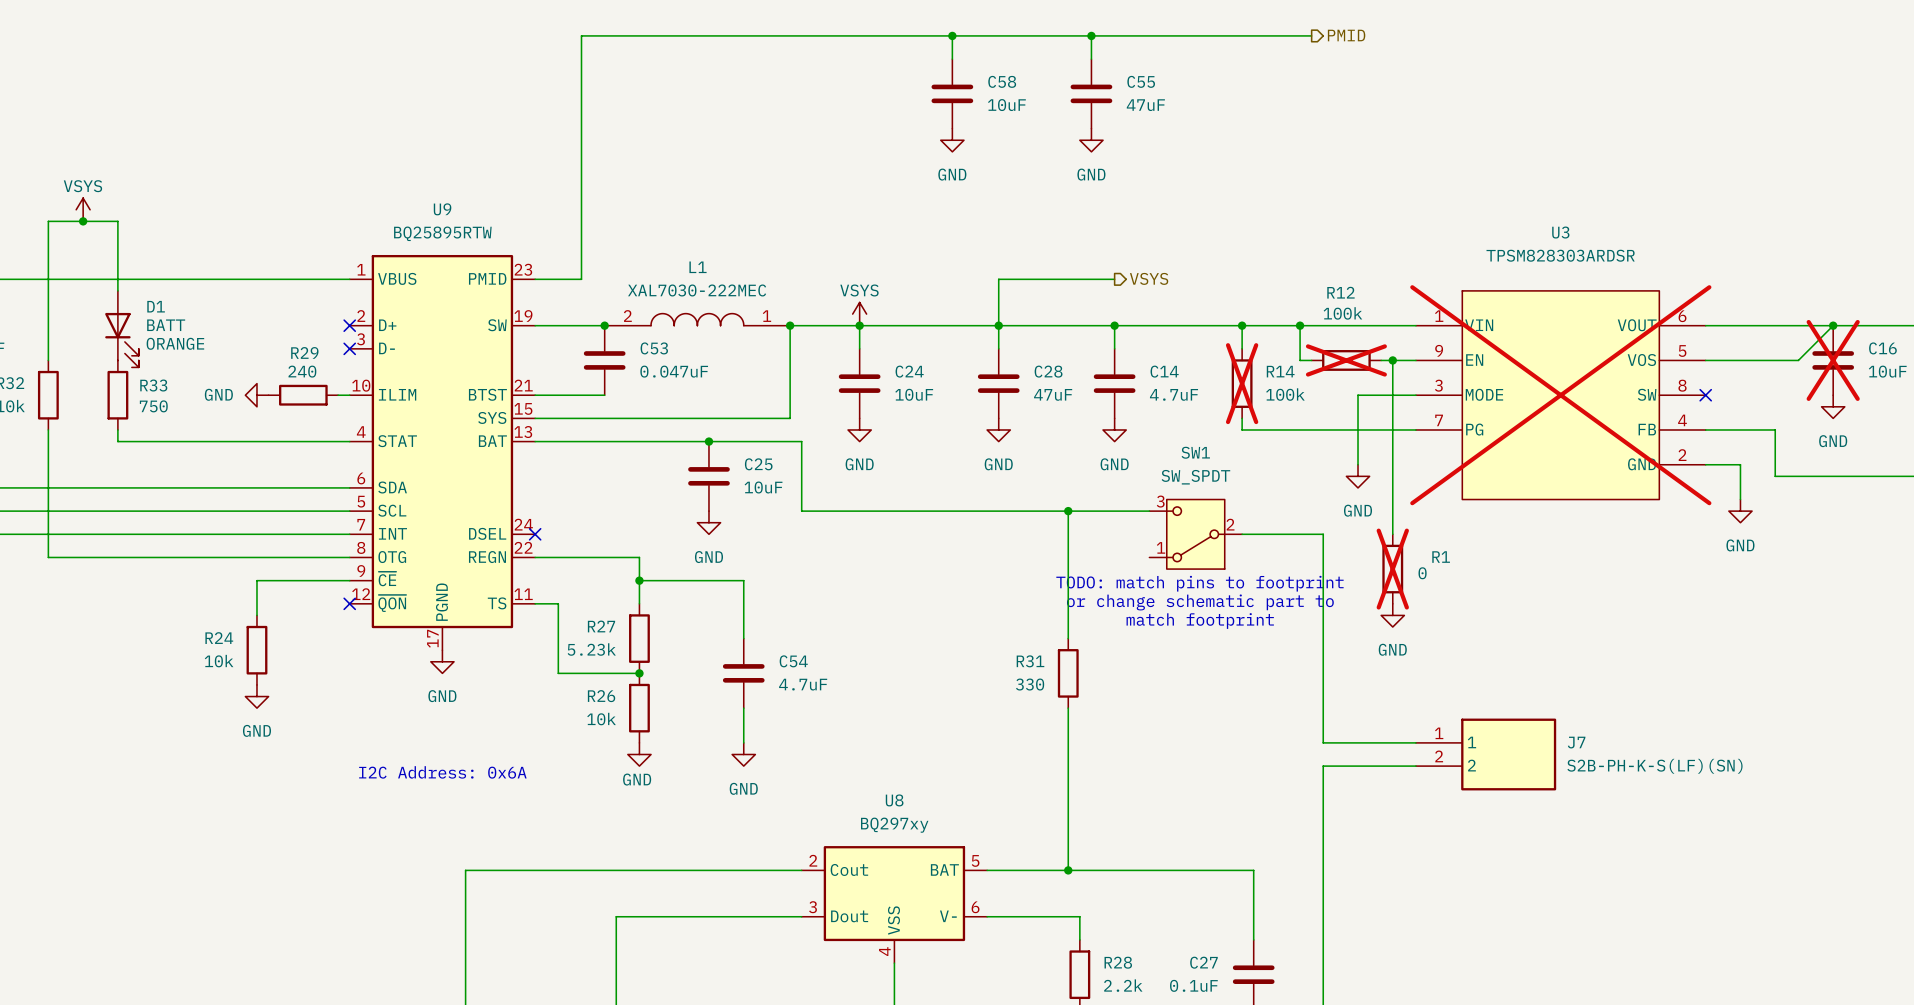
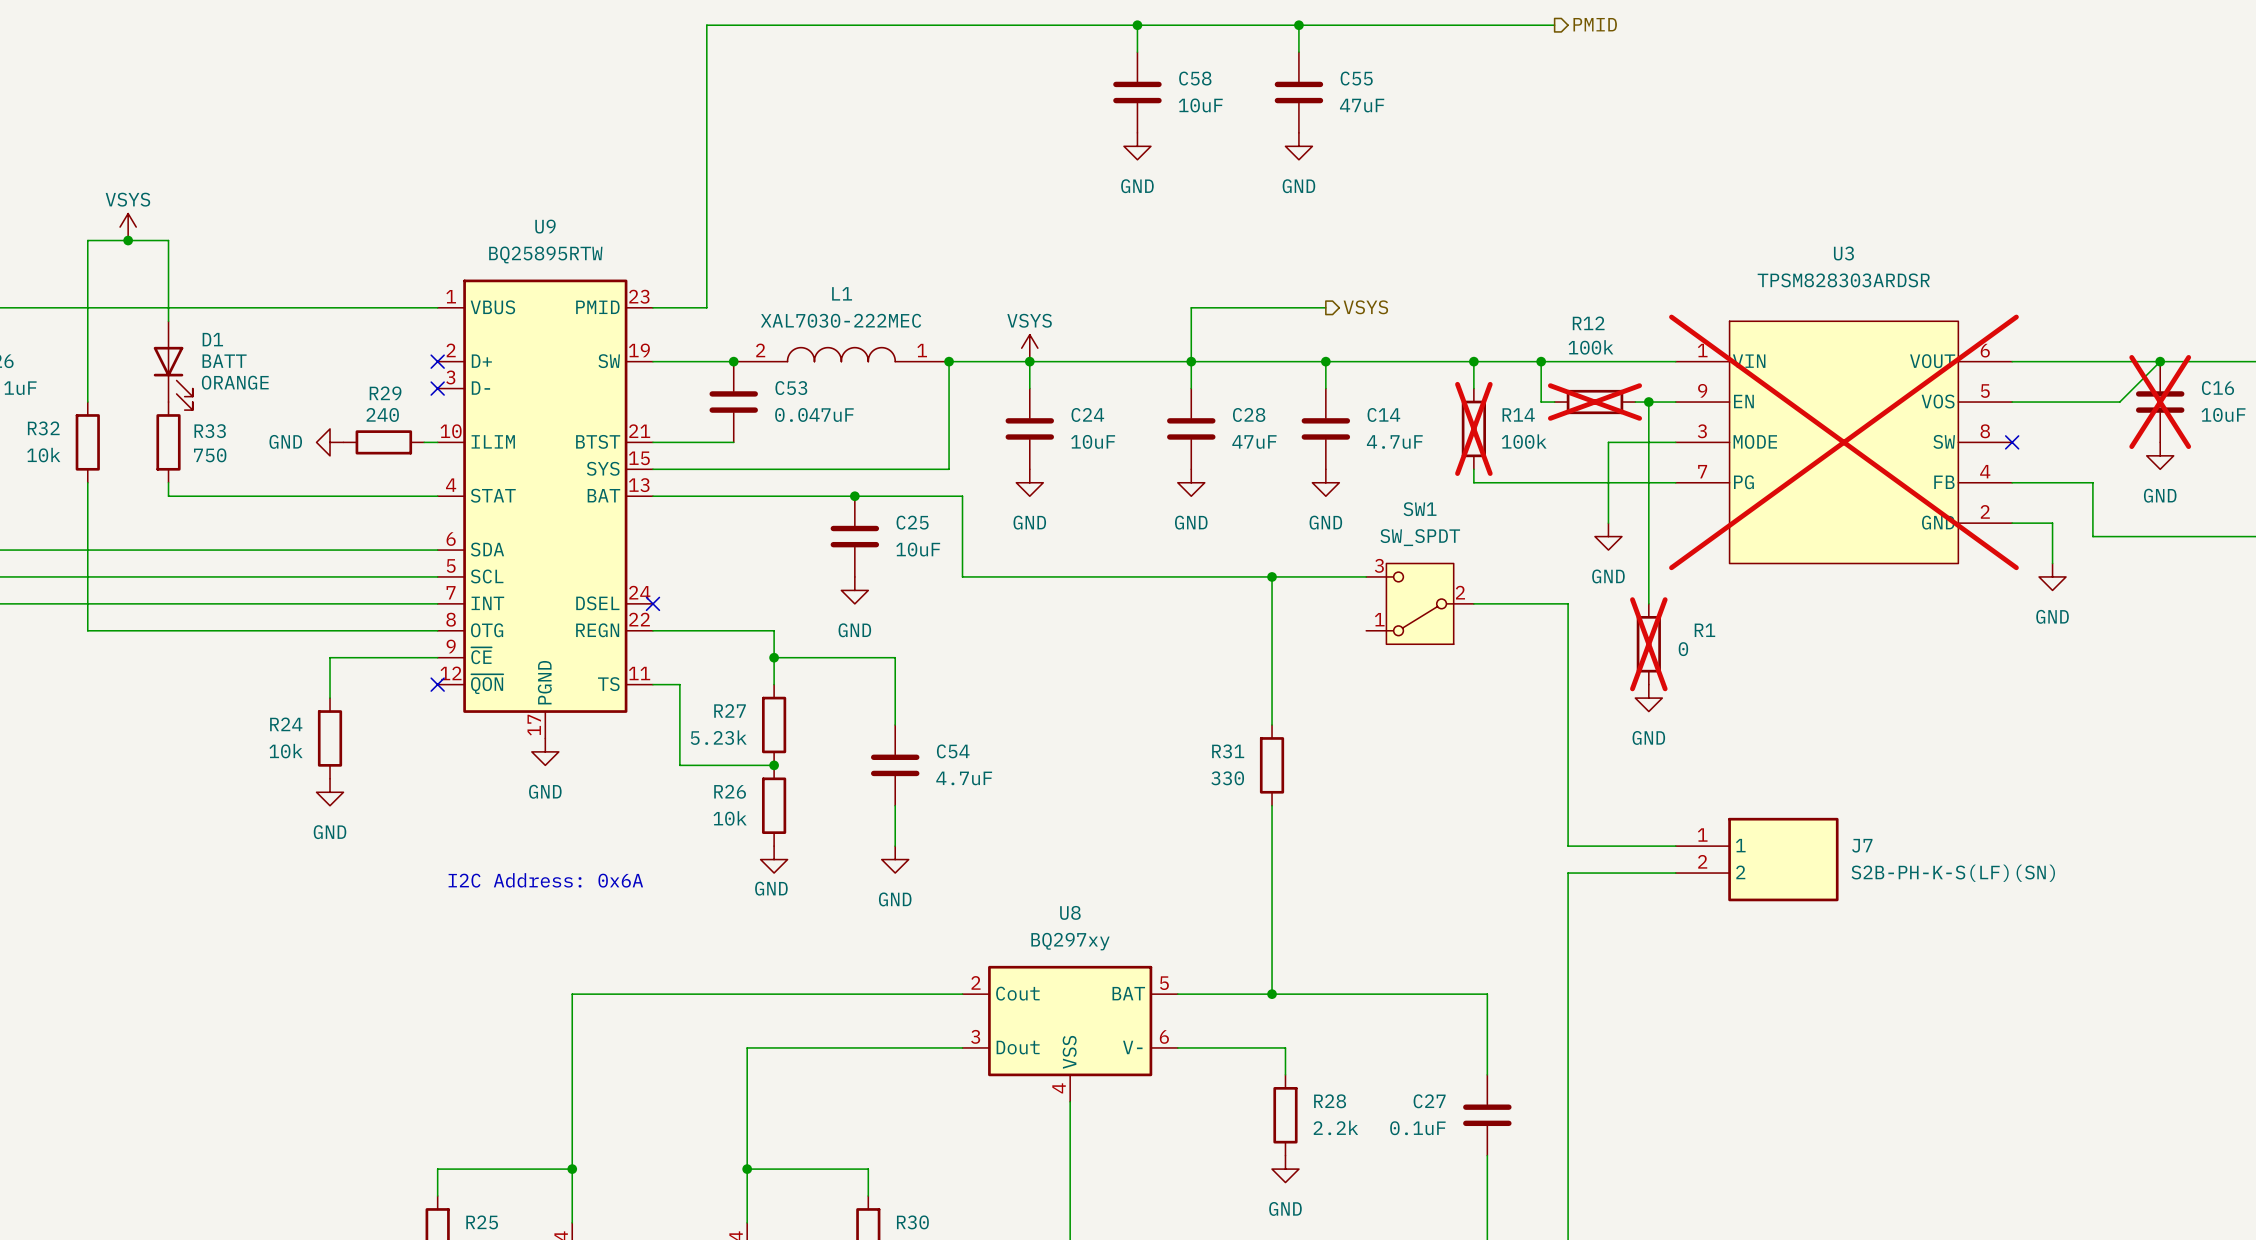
text: TODO: match pins to footprint (1199, 583) -> none
text: or change schematic part to (1200, 602) -> none
text: match footprint (1200, 621) -> none

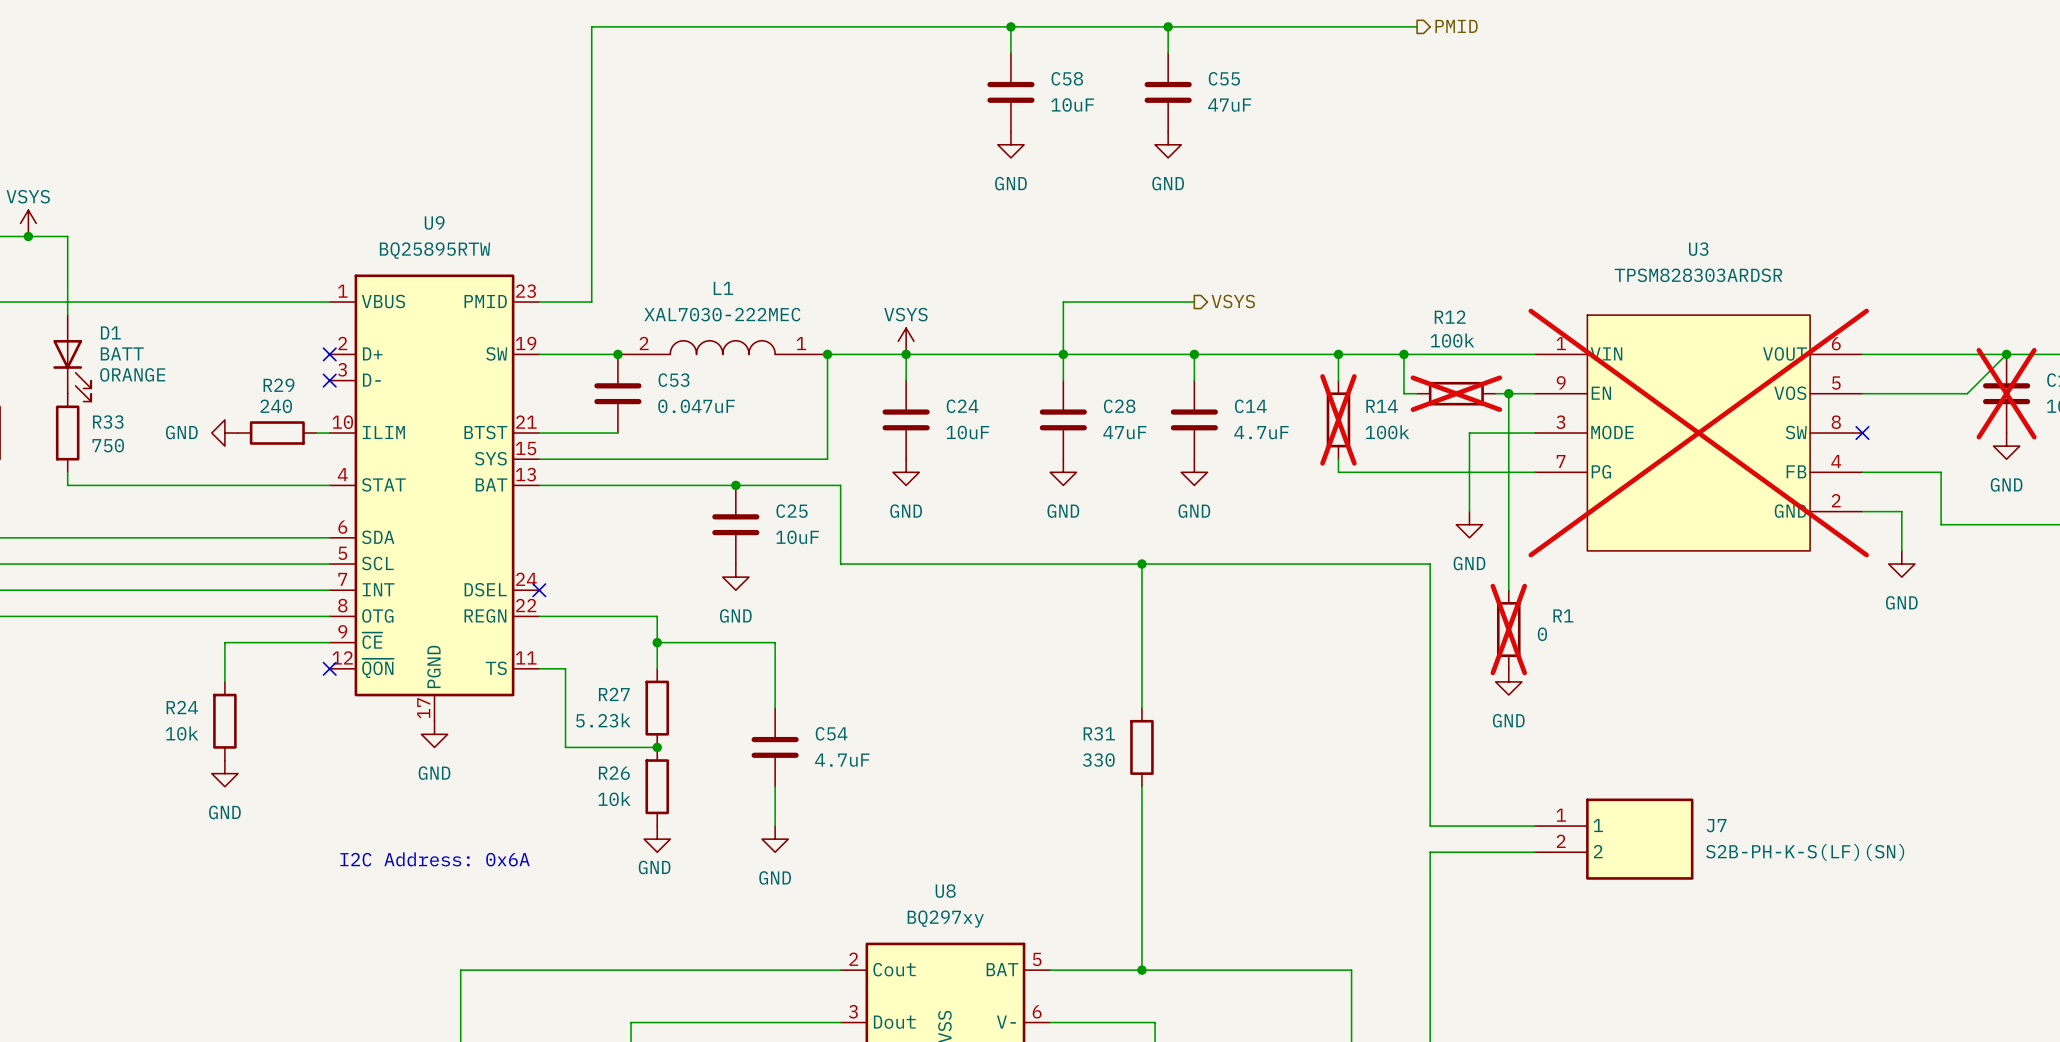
SW1: SW_SPDT (1420, 603) -> none
wire: (1473, 603) (1568, 603) -> (1233, 564) (1430, 564) (1430, 590)

